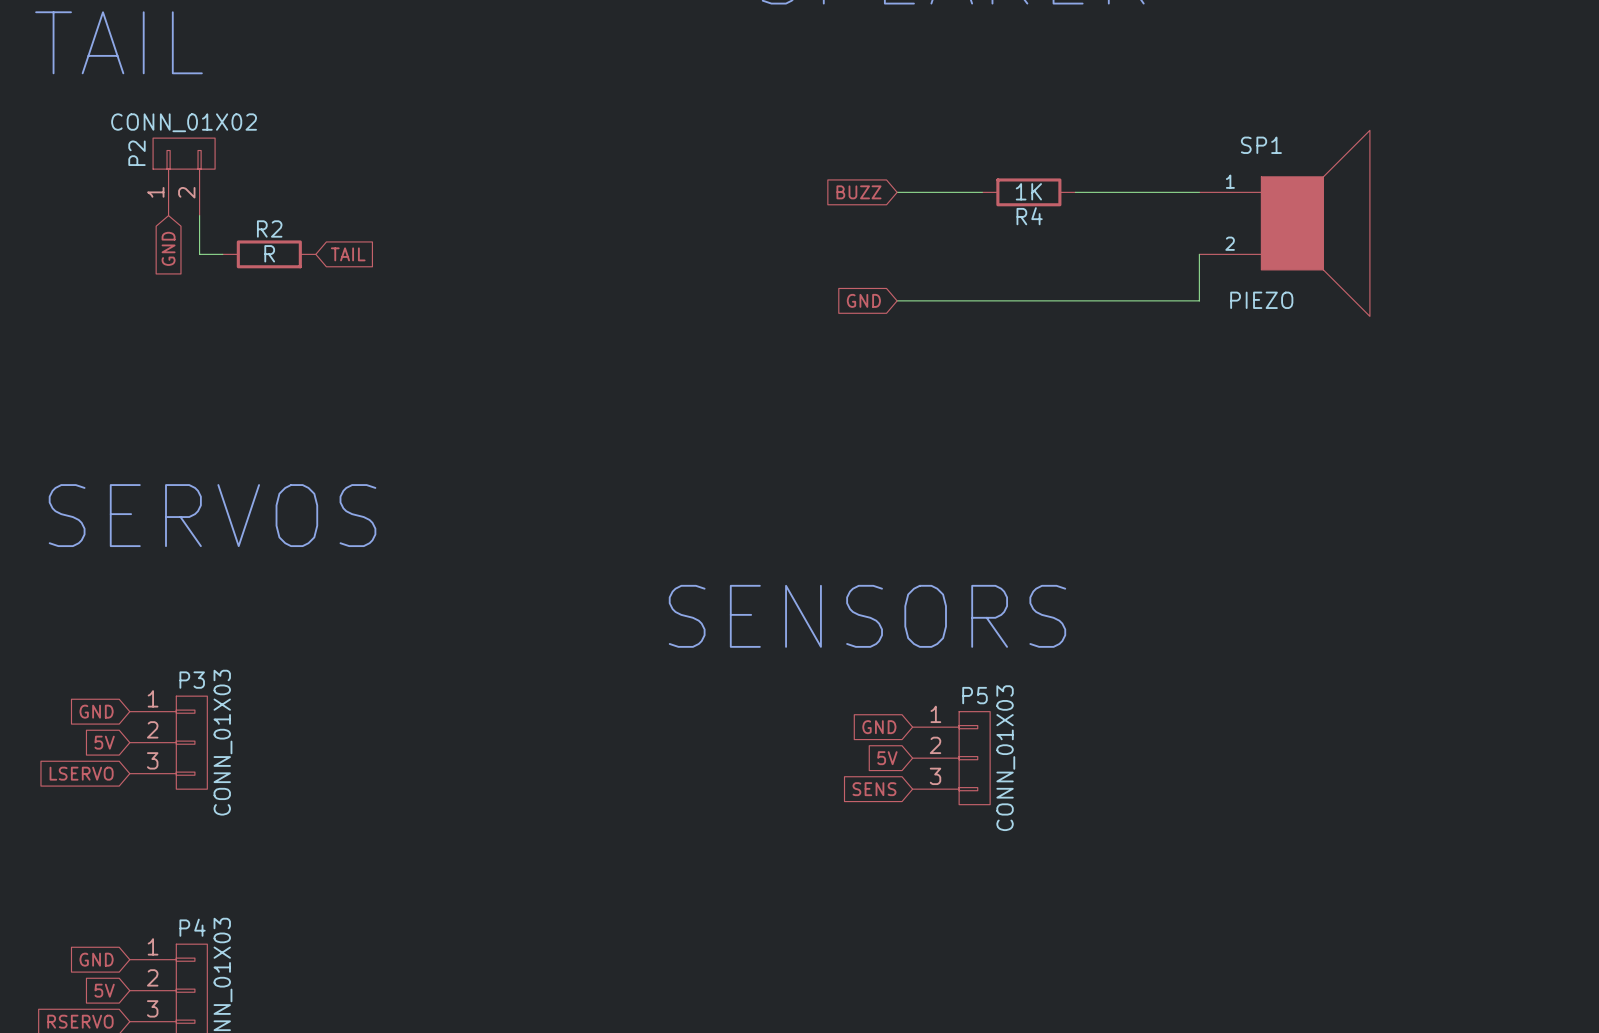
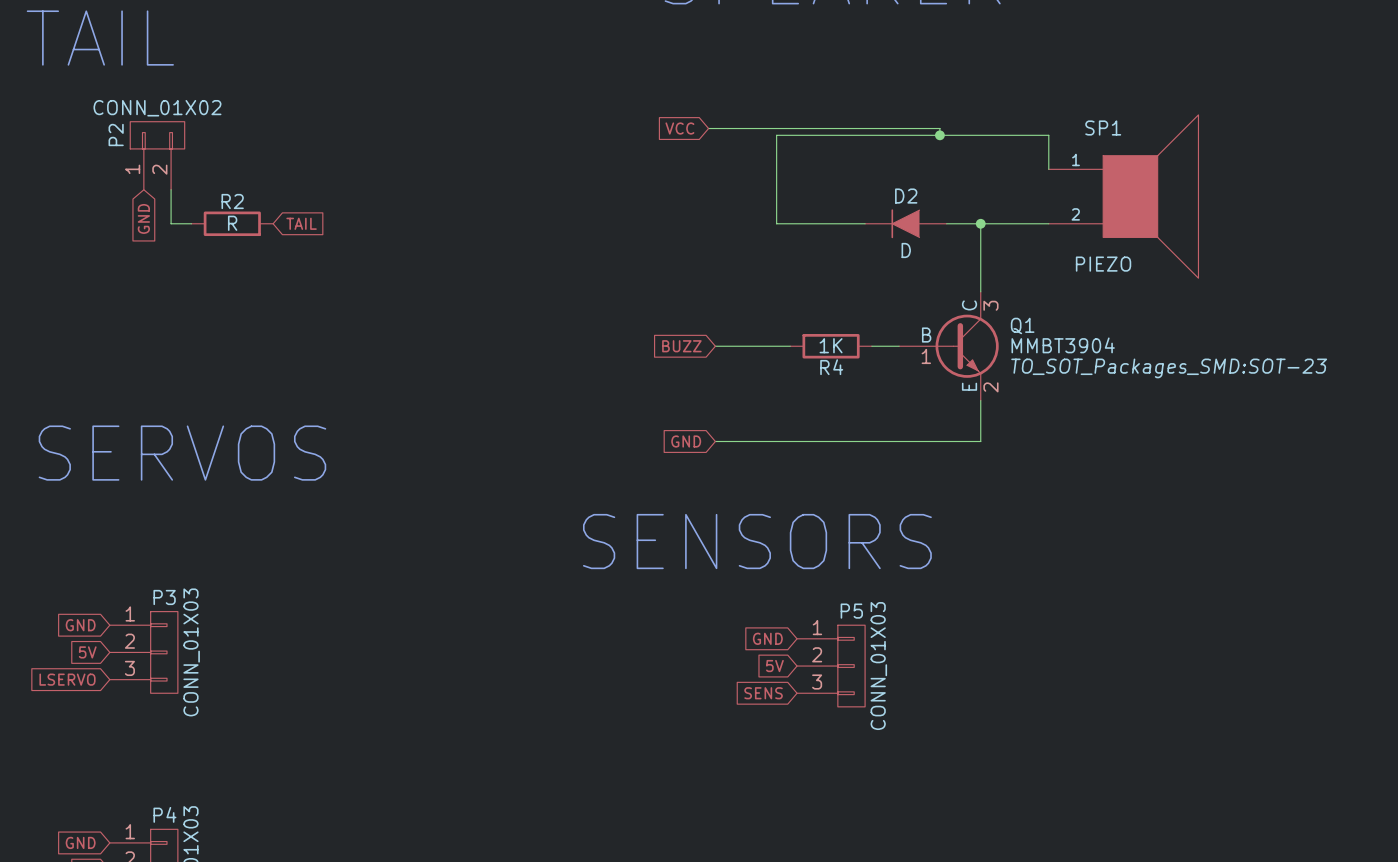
global label: none -> VCC (679, 128)
wire: none -> (708, 128) (939, 128) (939, 135)
junction: none -> (939, 135)
global label position: BUZZ (858, 192) -> BUZZ (681, 346)
wire: (897, 192) (982, 192) -> (715, 346) (790, 346)
R4 position: (1028, 192) -> (831, 346)
wire: (1075, 192) (1199, 192) -> (865, 223) (776, 223) (776, 135) (1048, 135) (1048, 169)
D2: none -> D (905, 223)
wire: none -> (980, 223) (980, 291)
junction: none -> (980, 223)
wire: (1199, 254) (1199, 300) (897, 300) -> (1048, 223) (946, 223)
global label position: GND (863, 300) -> GND (686, 441)
wire: none -> (871, 346) (899, 346)
Q1: none -> MMBT3904 (948, 346)
wire: none -> (980, 400) (980, 441) (715, 441)

